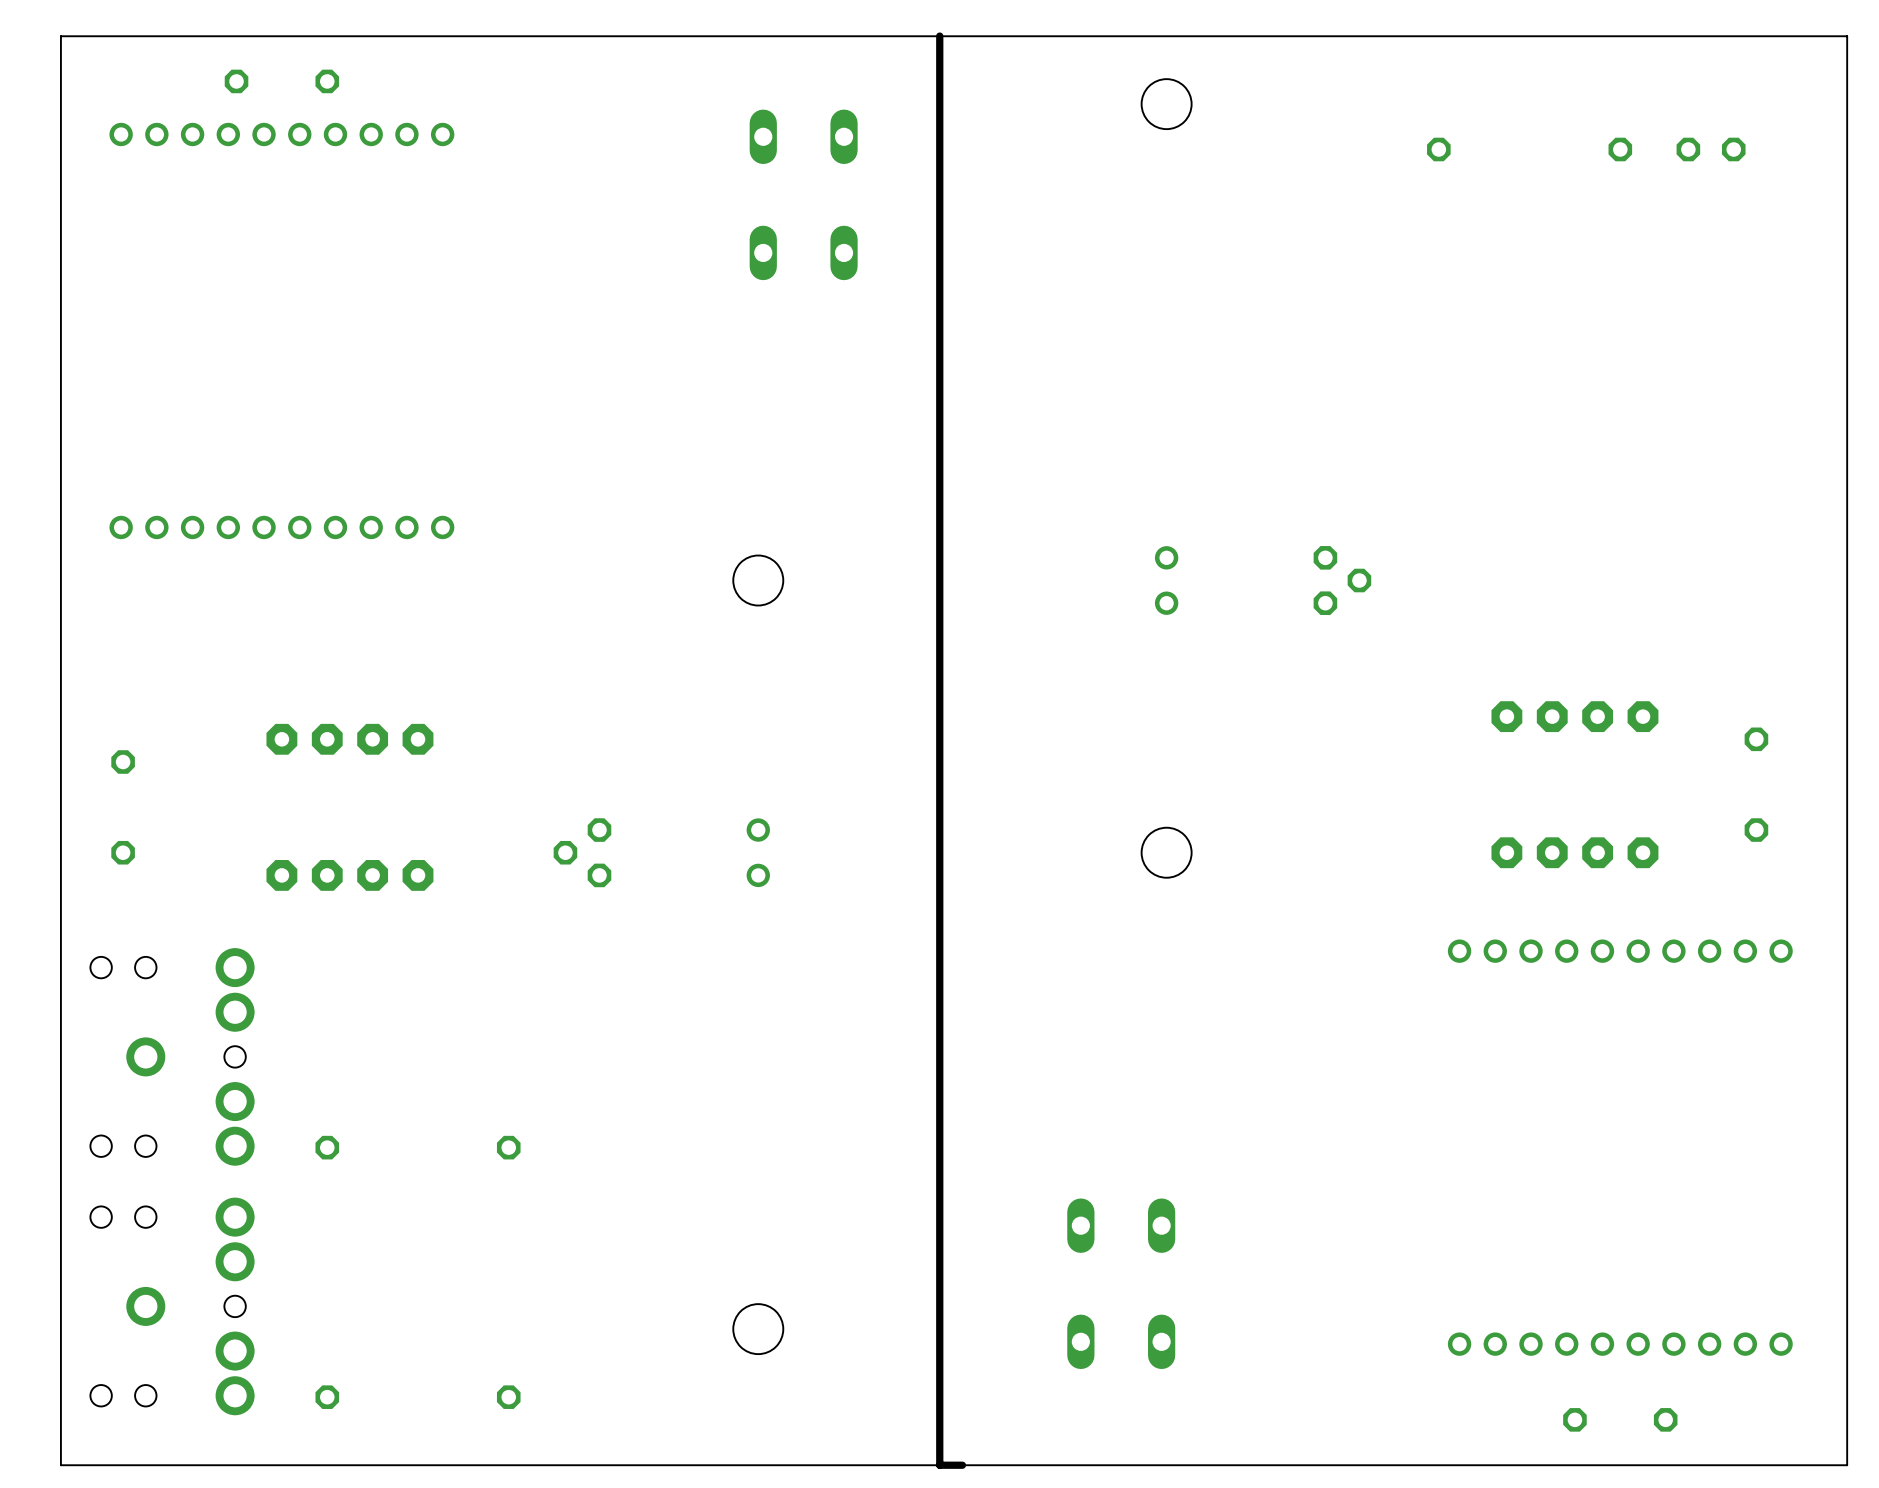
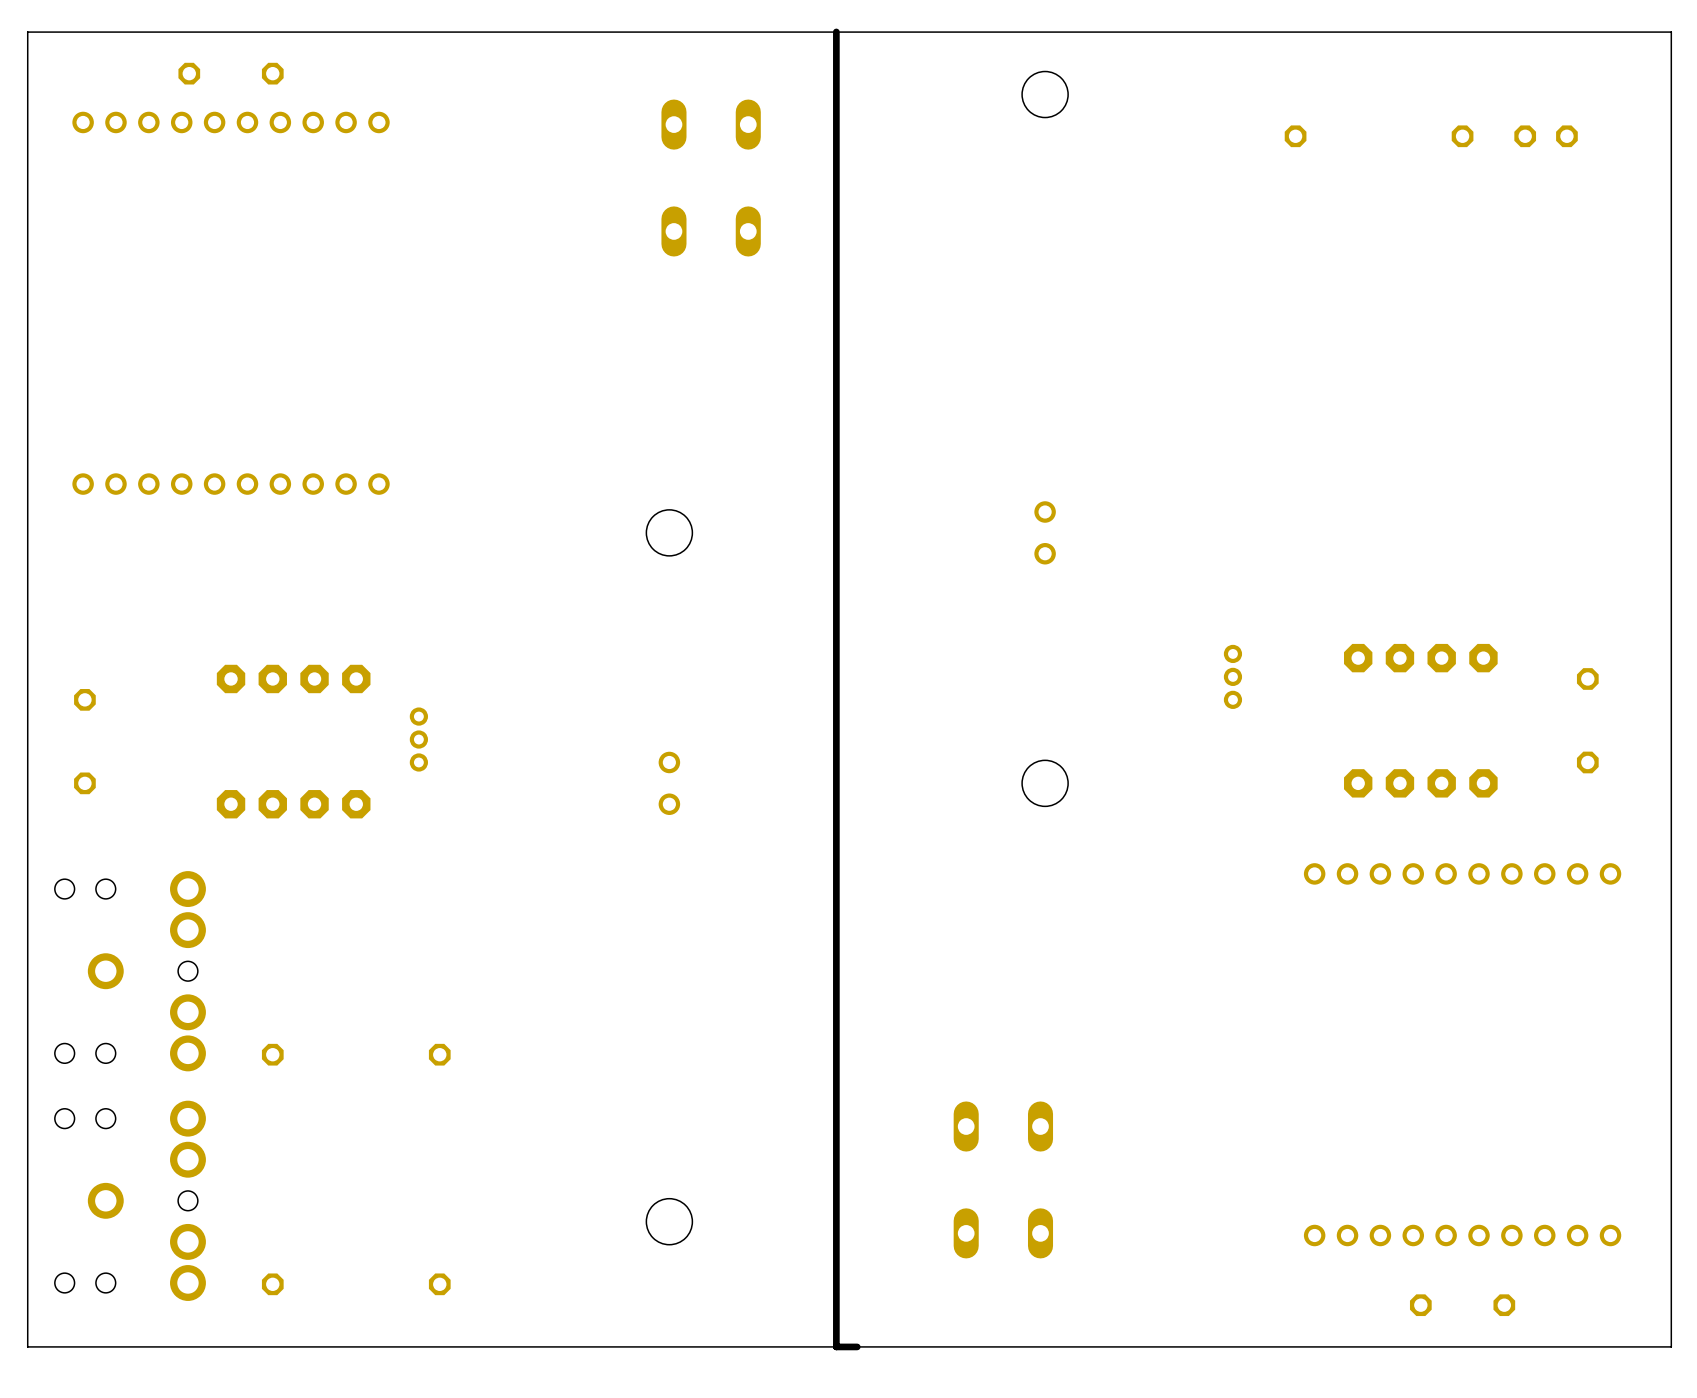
part: (1342, 580) -> none
part: none -> (1232, 676)
part: none -> (418, 739)
part: (582, 852) -> none

